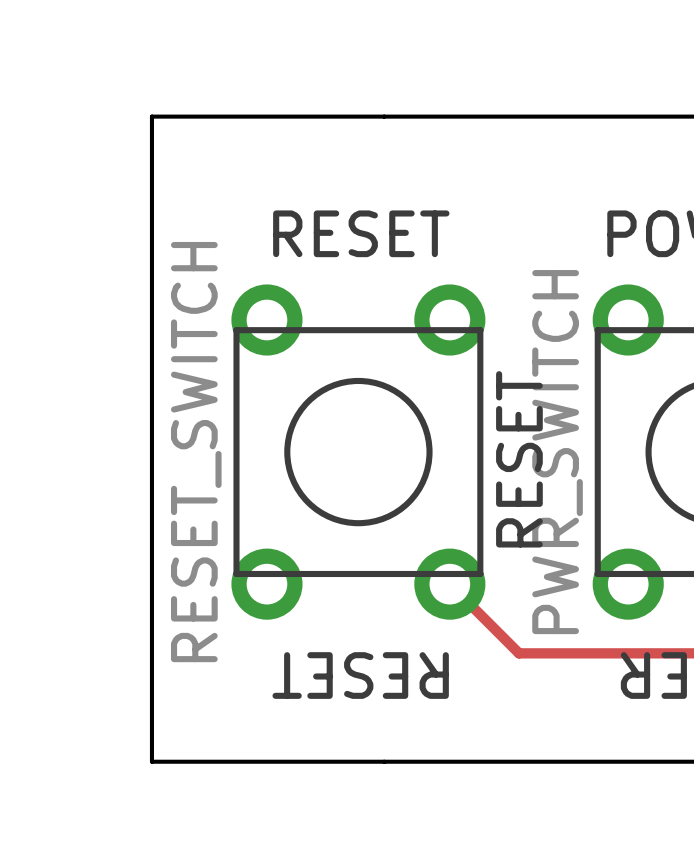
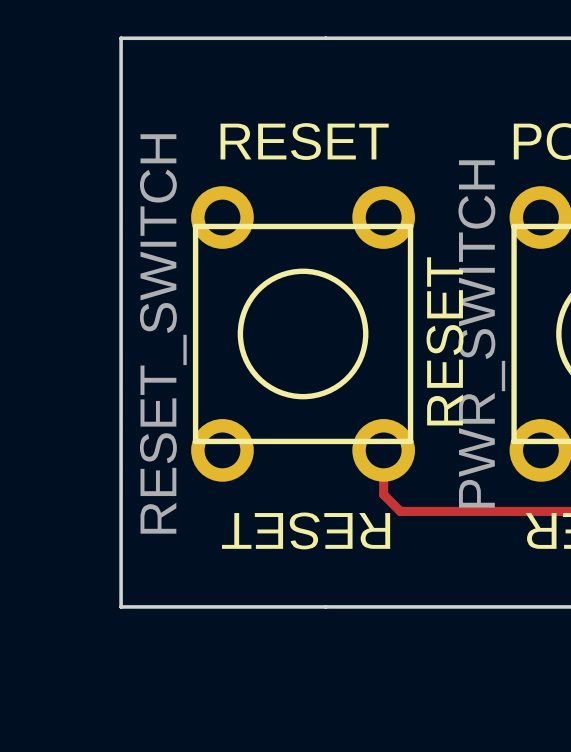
track: (449, 584) (519, 653) -> (383, 450) (383, 494) (400, 511) (444, 511)

